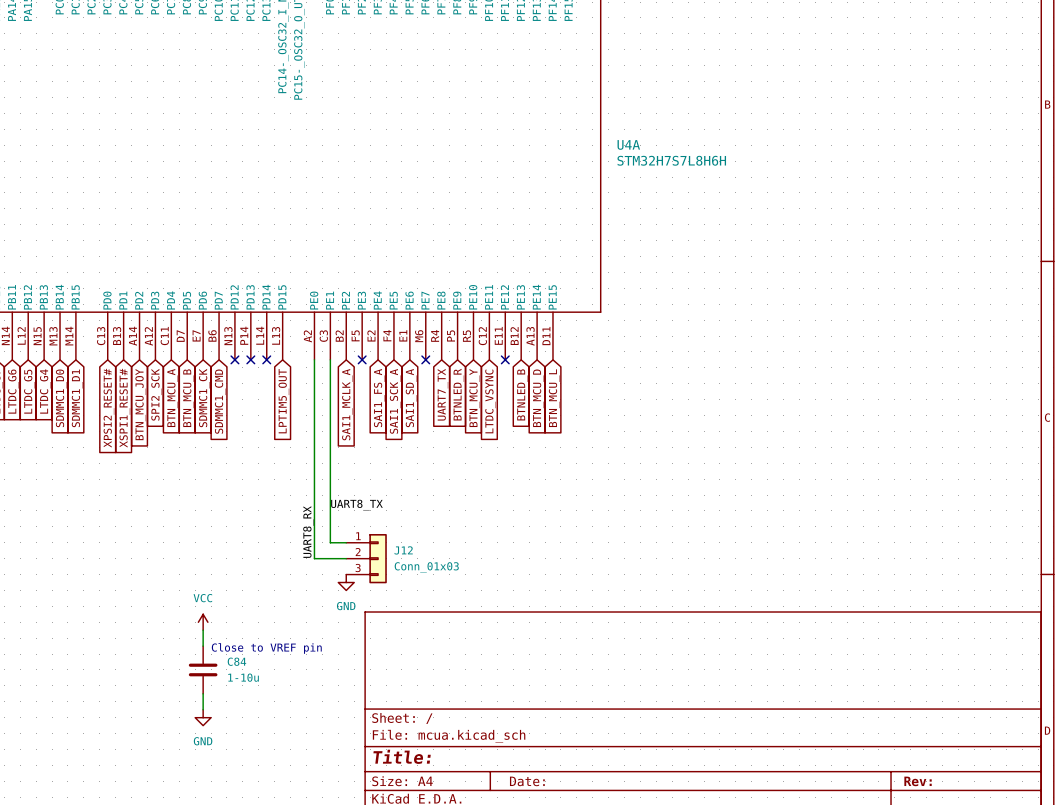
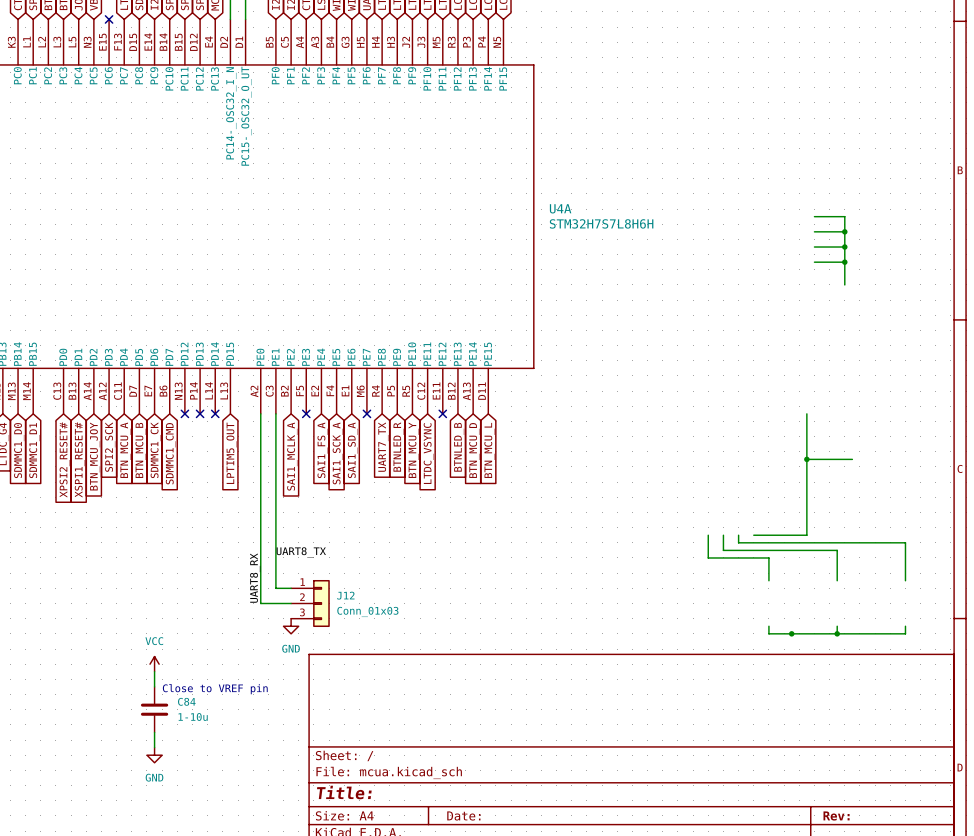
wire: none -> (814, 216) (844, 216) (844, 284)
wire: none -> (814, 231) (844, 231)
junction: none -> (844, 231)
wire: none -> (814, 247) (844, 247)
junction: none -> (844, 247)
wire: none -> (814, 262) (844, 262)
junction: none -> (844, 262)
wire: none -> (806, 413) (806, 535) (753, 535)
wire: none -> (806, 459) (852, 459)
junction: none -> (806, 459)
wire: none -> (708, 535) (708, 557) (768, 557) (768, 580)
wire: none -> (723, 535) (723, 550) (837, 550) (837, 580)
wire: none -> (738, 535) (738, 542) (905, 542) (905, 580)
wire: none -> (768, 626) (768, 633) (905, 633) (905, 626)
wire: none -> (837, 626) (837, 633)
junction: none -> (791, 633)
junction: none -> (837, 633)

